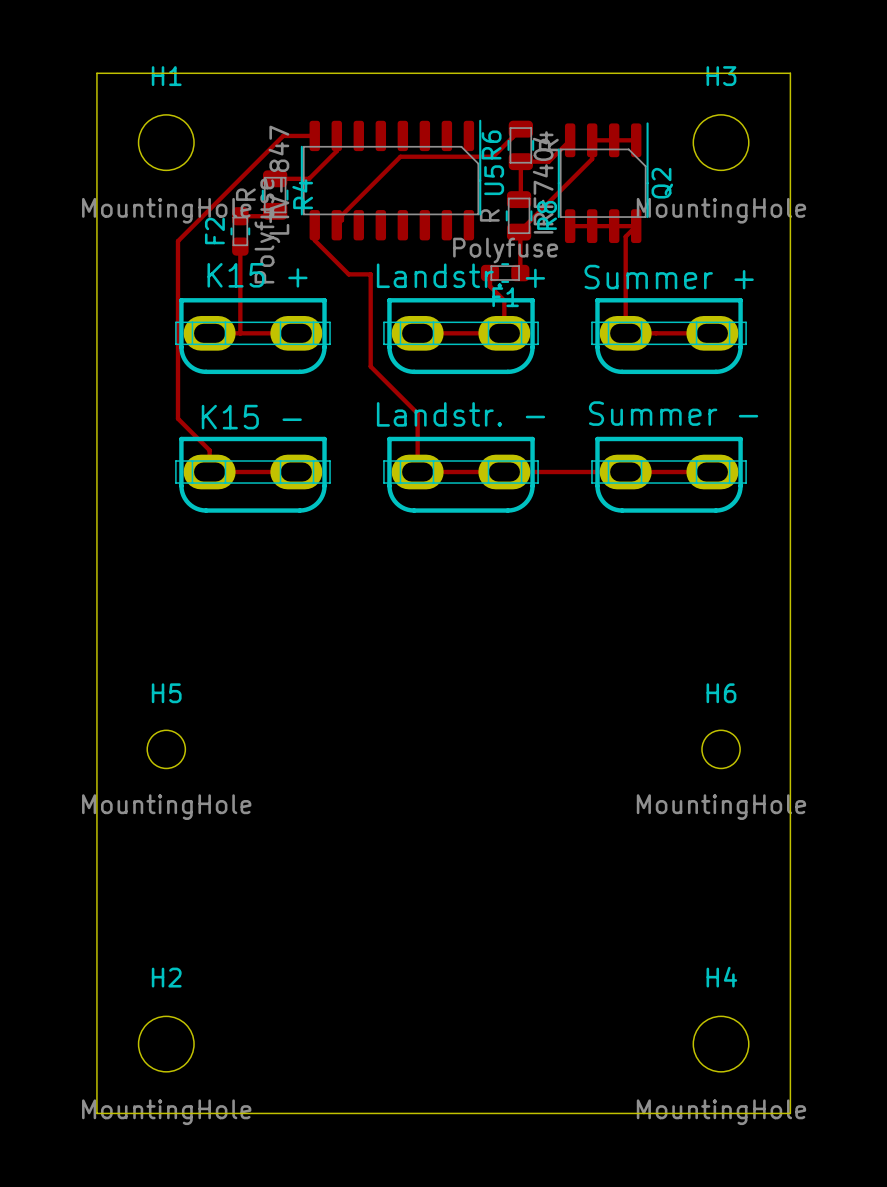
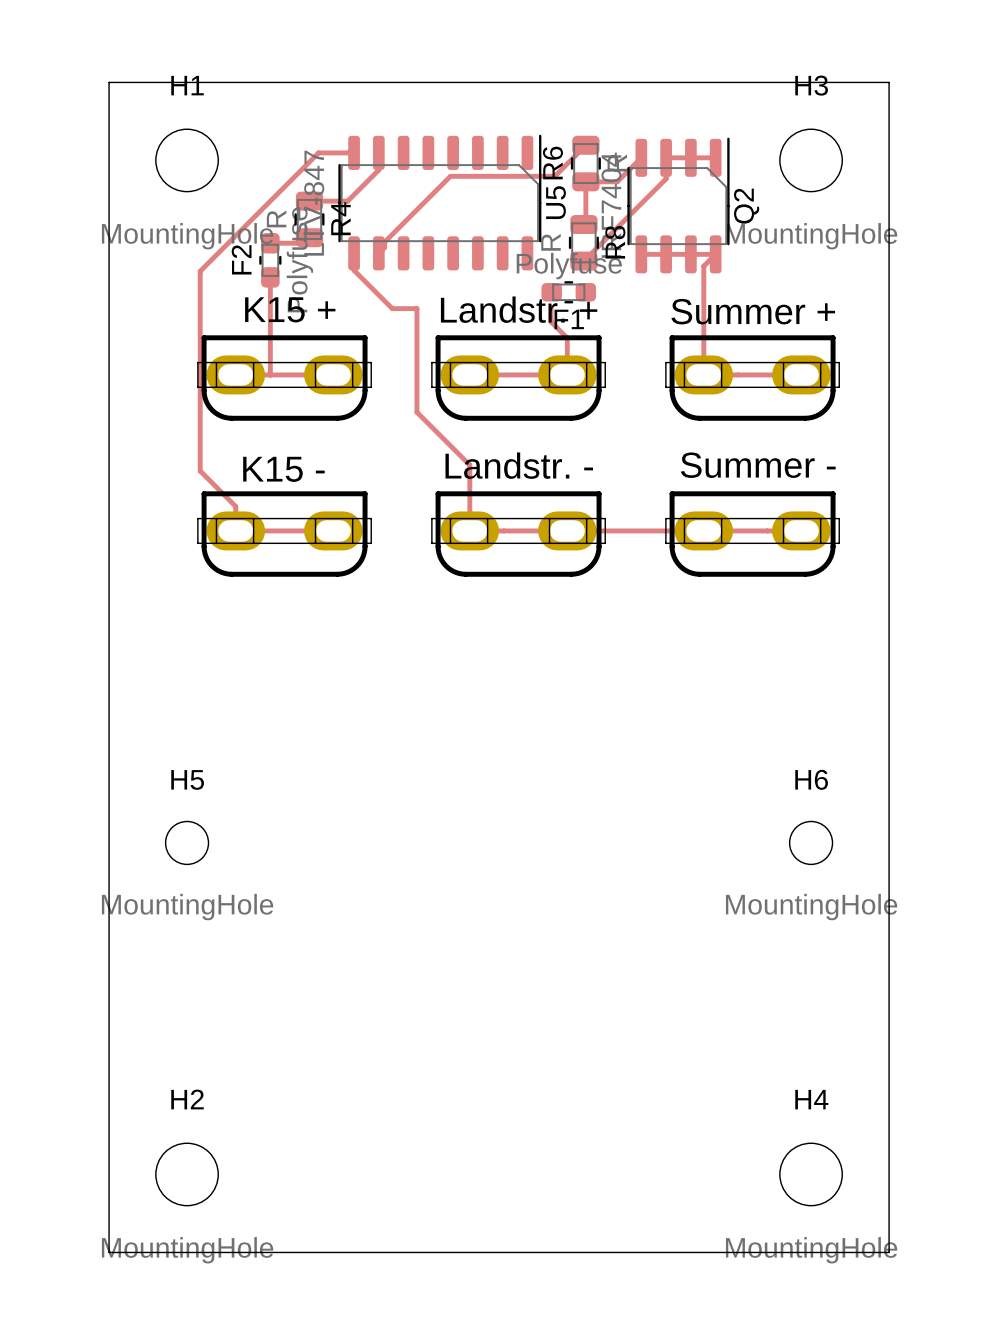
top track: (520, 233) (520, 273) -> none
F1 position: (505, 273) -> (568, 292)

